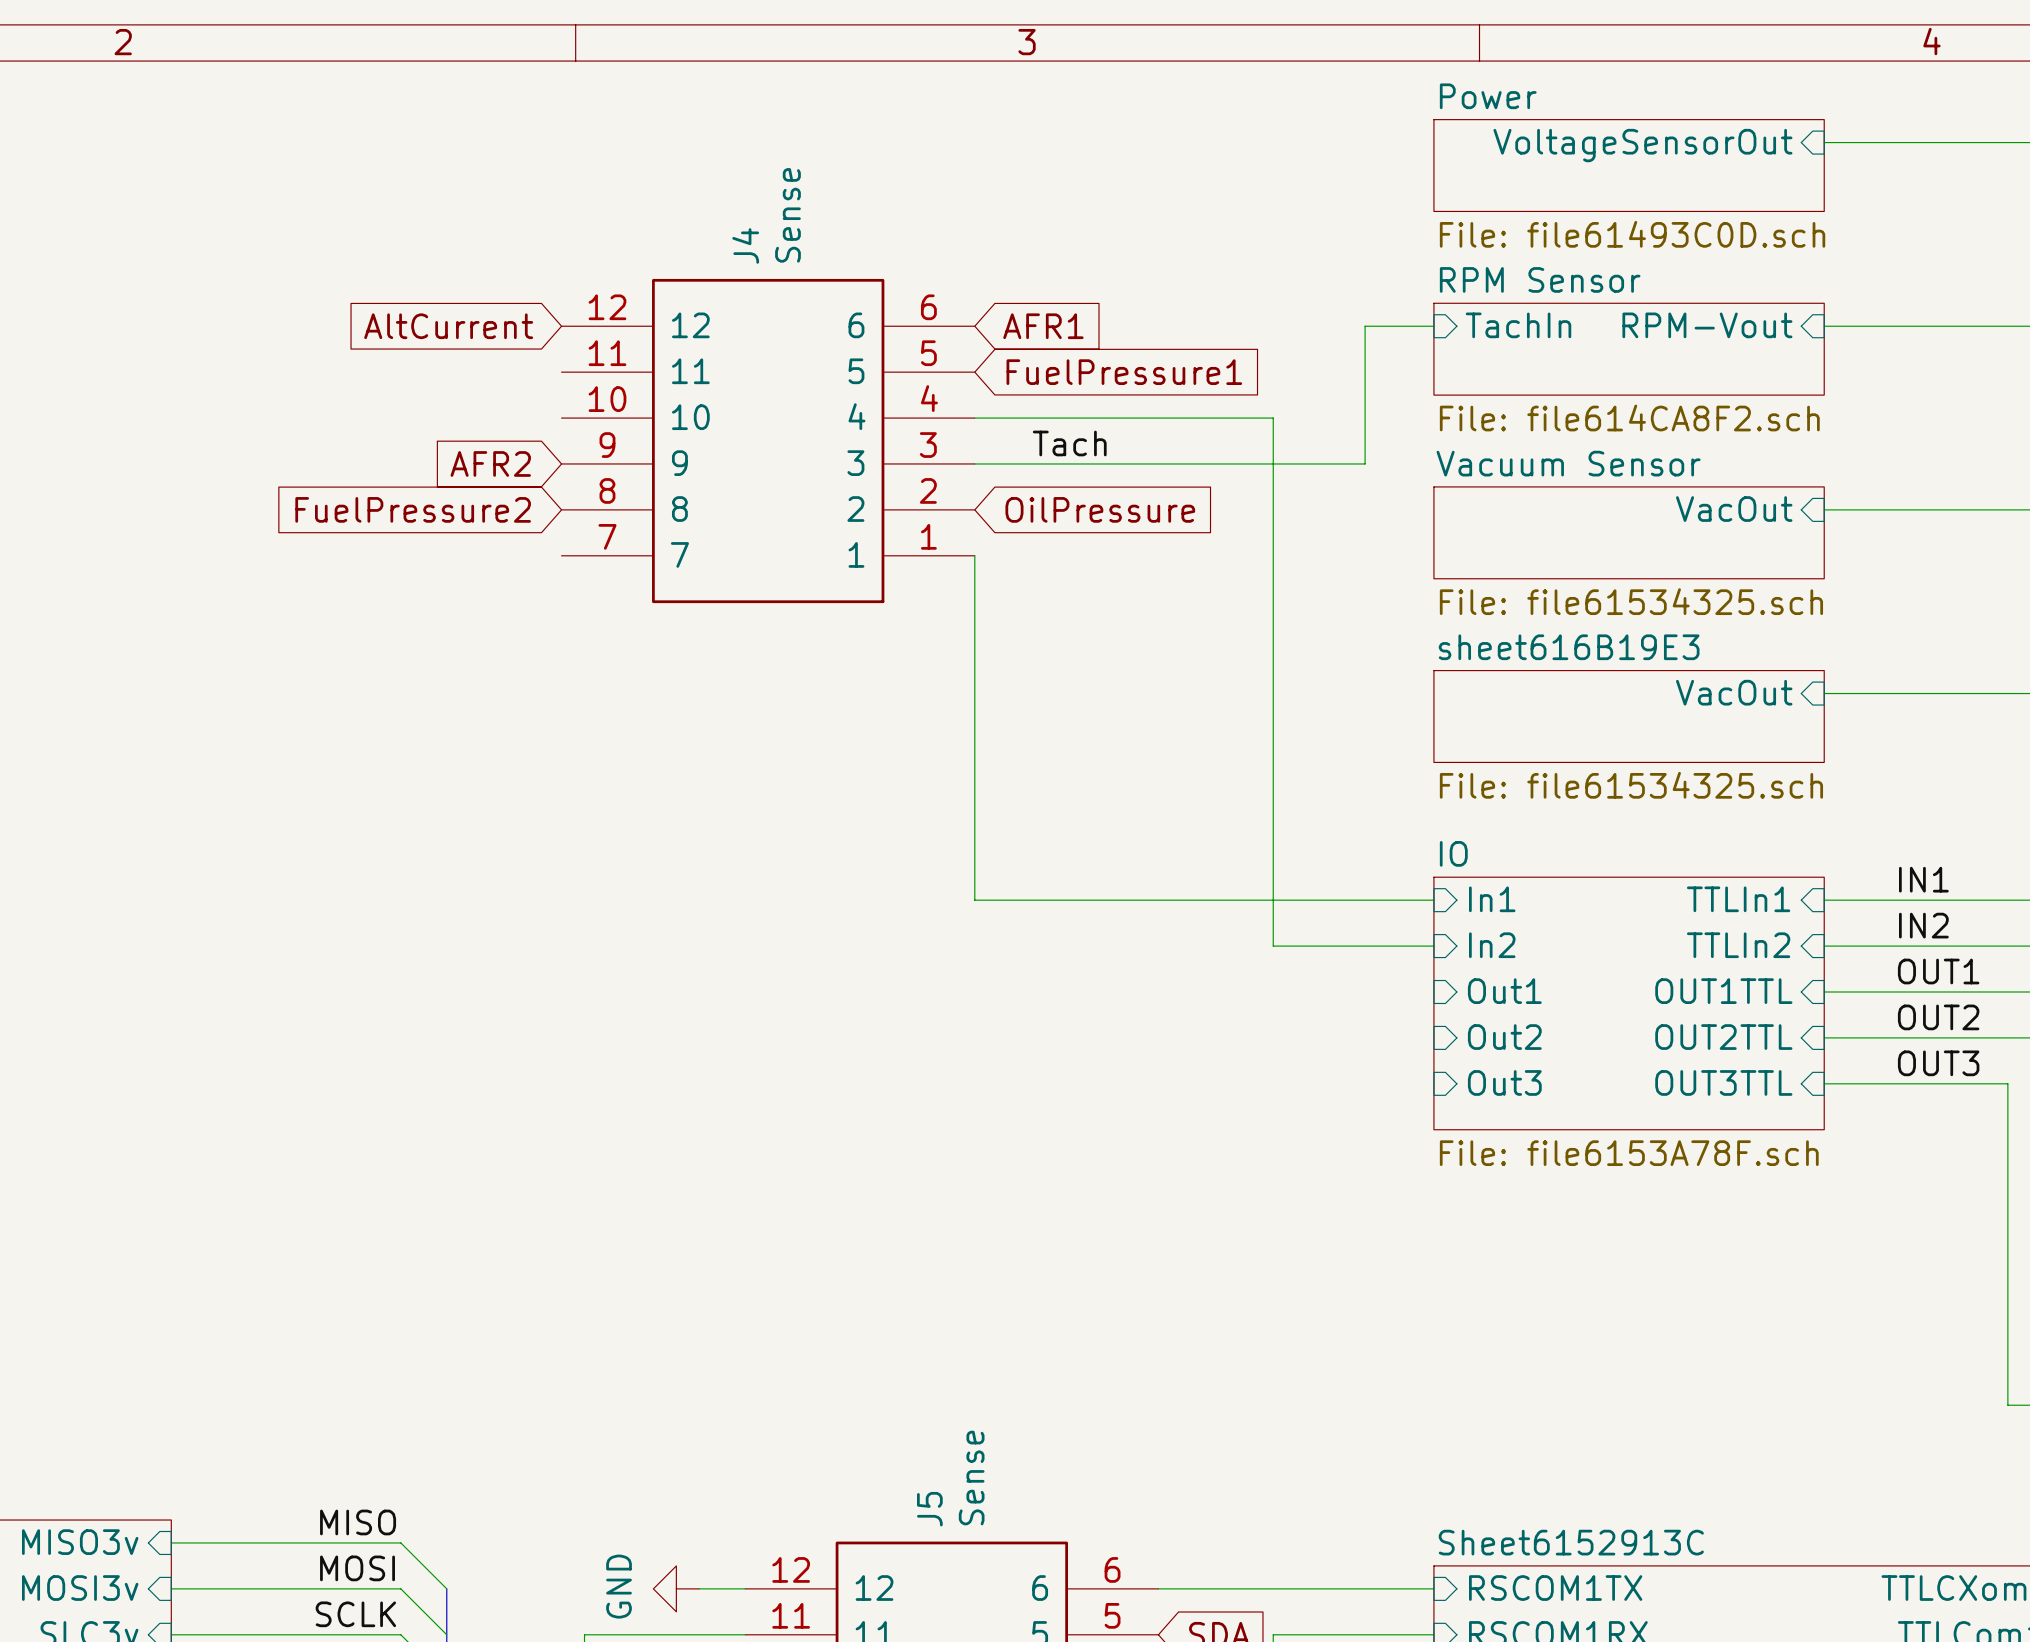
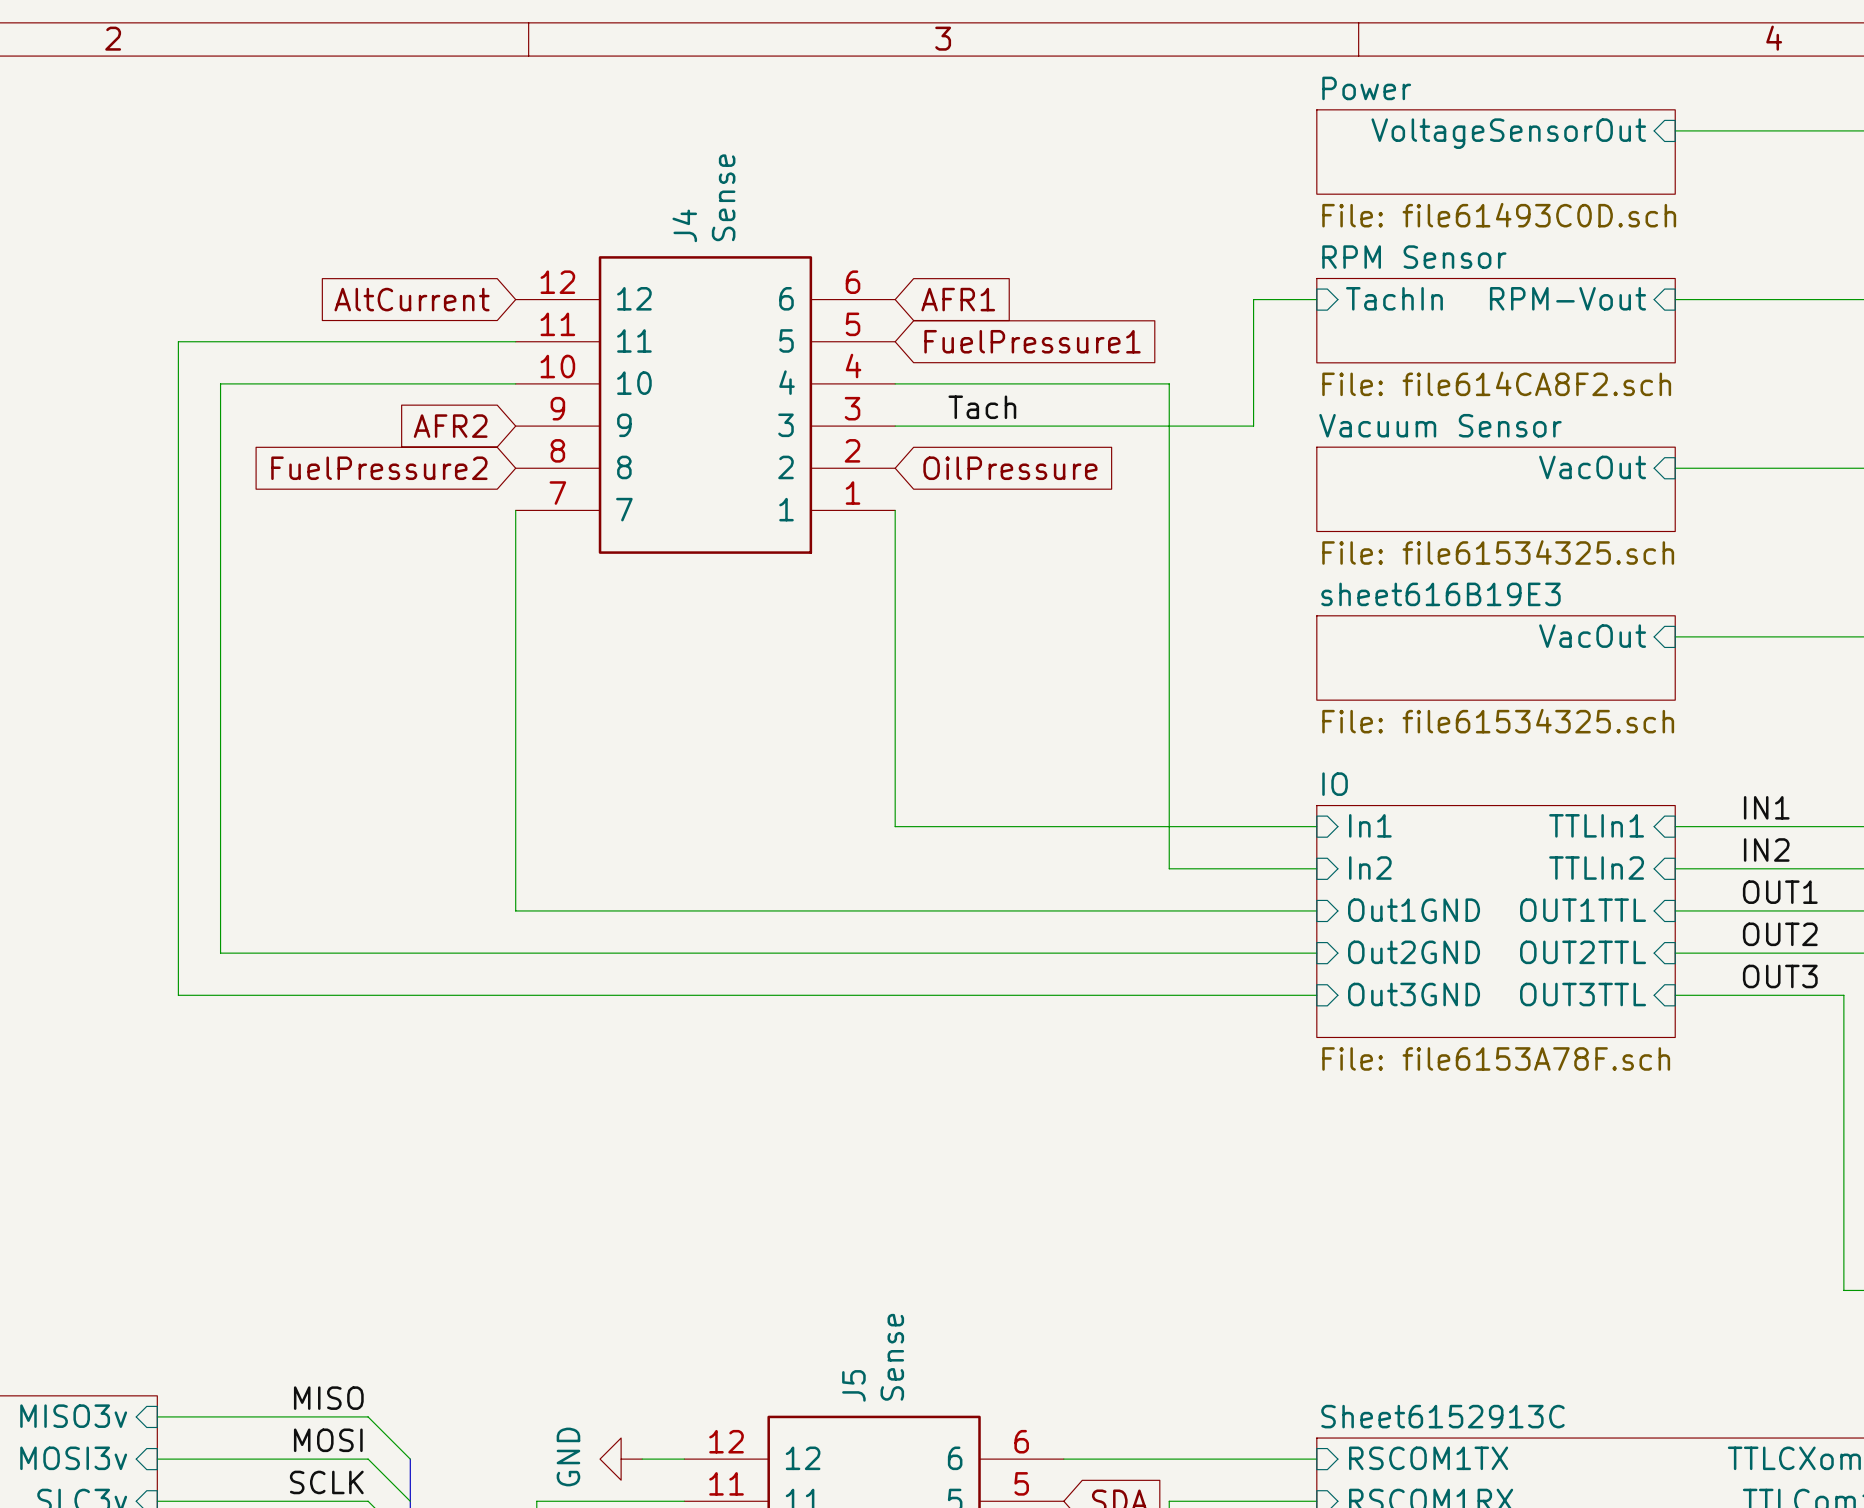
wire: none -> (515, 341) (178, 341) (178, 995) (1316, 995)
wire: none -> (515, 383) (220, 383) (220, 953) (1316, 953)
wire: none -> (515, 510) (515, 910) (1316, 910)
sheet pin: Out1 (1504, 991) -> Out1GND (1414, 910)
sheet pin: Out2 (1504, 1037) -> Out2GND (1414, 952)
sheet pin: Out3 (1504, 1082) -> Out3GND (1414, 994)

